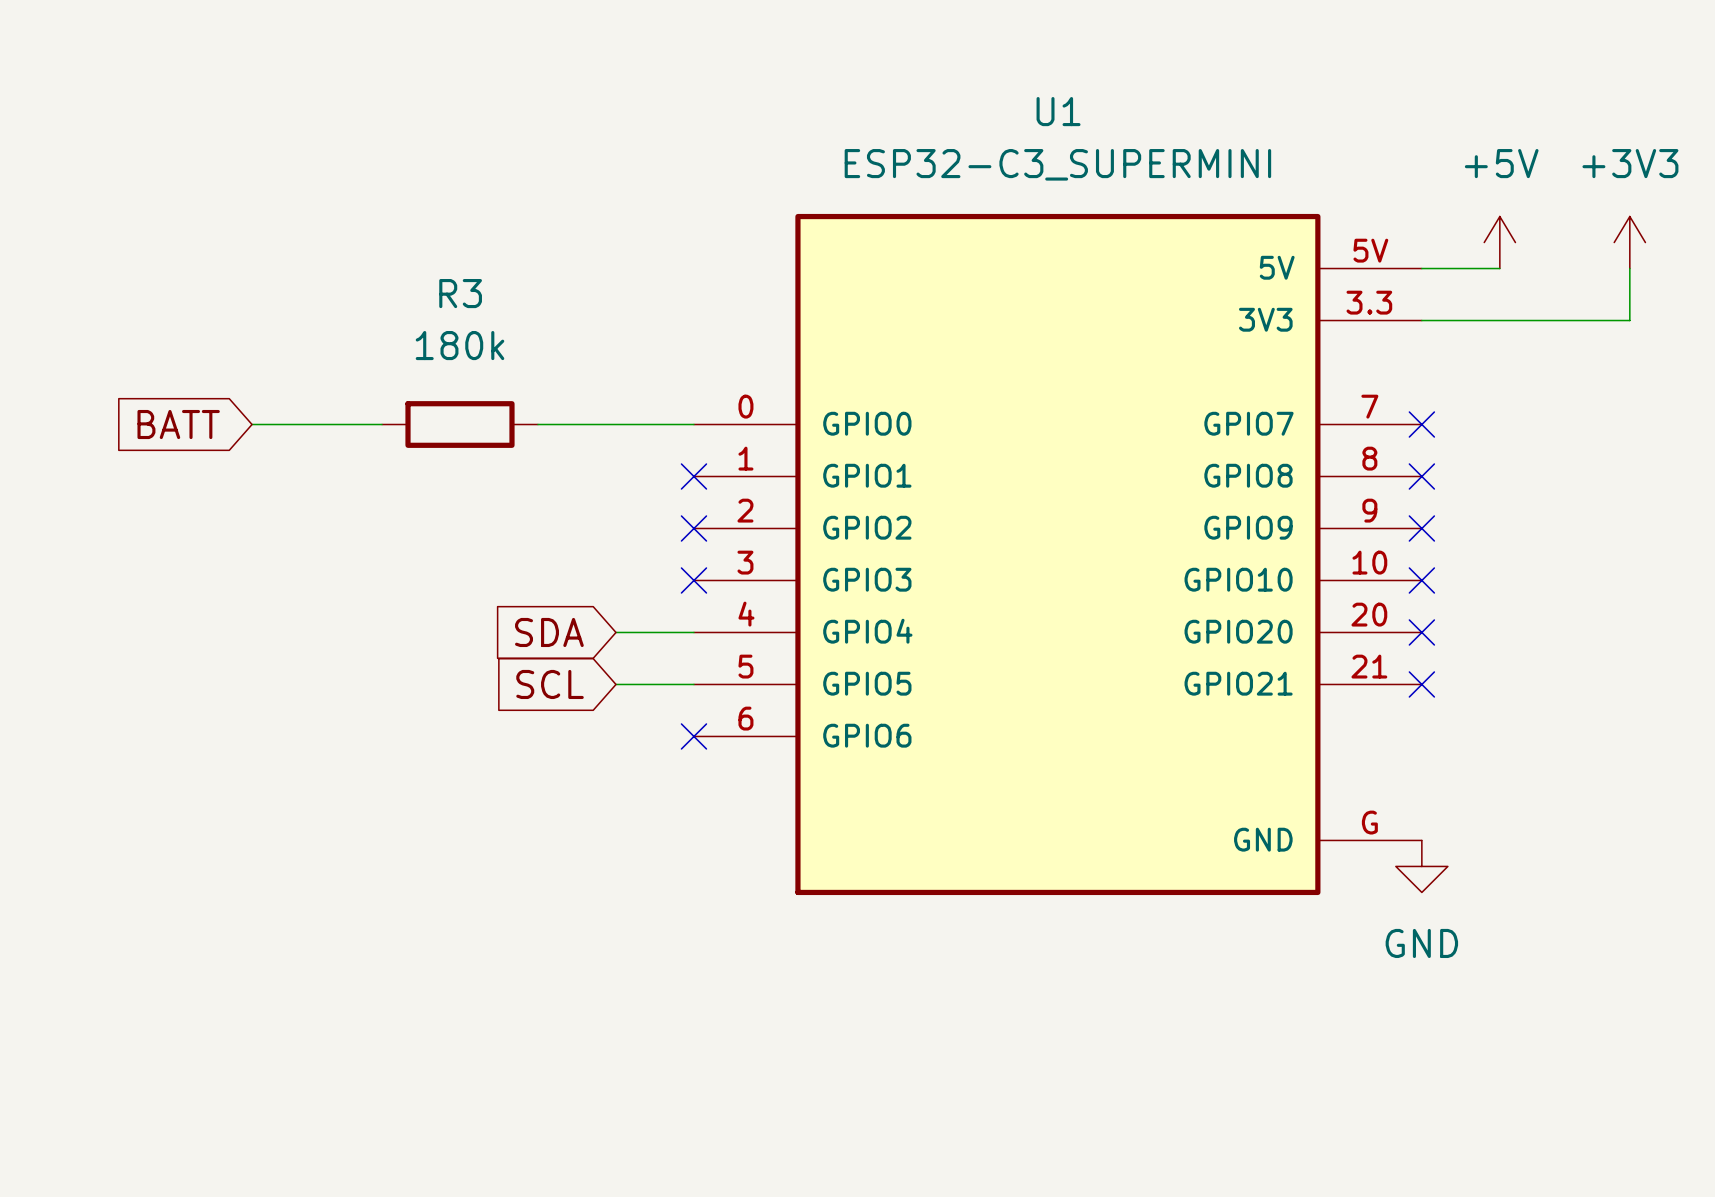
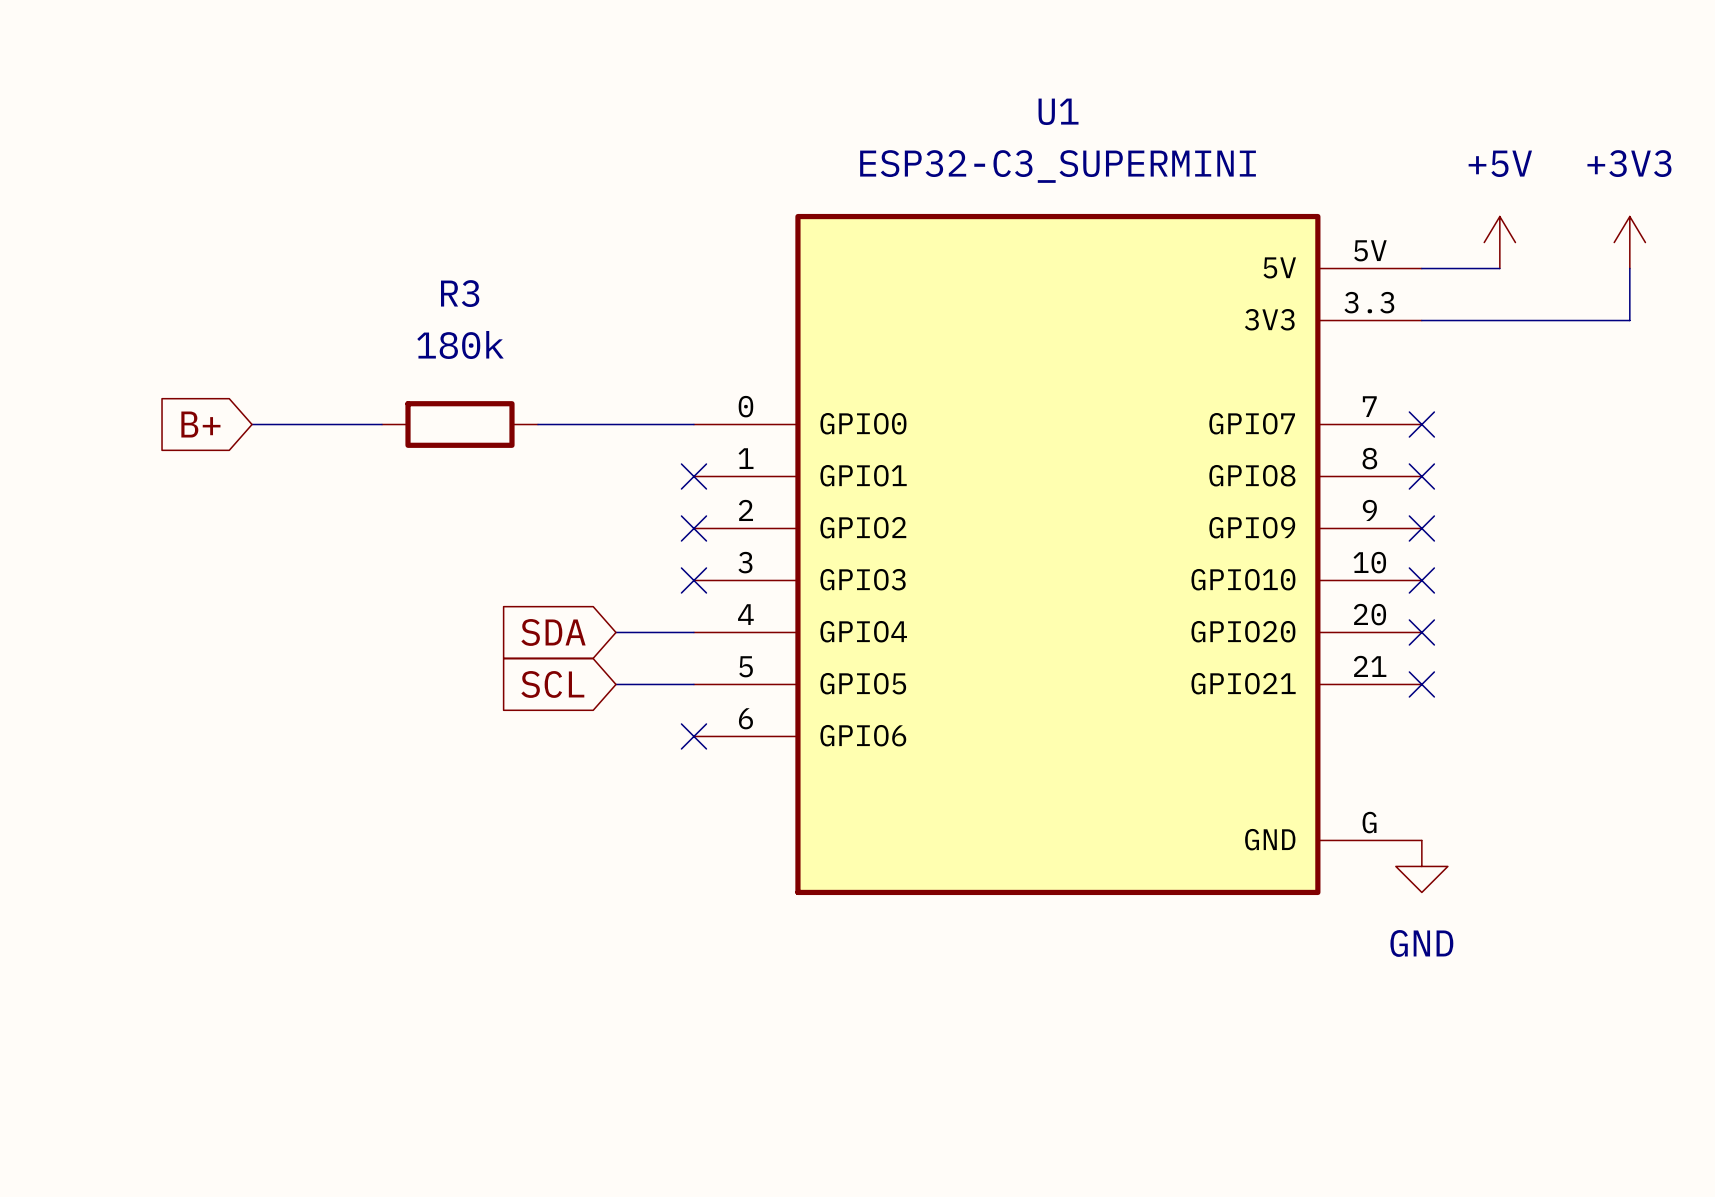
global label: BATT (178, 424) -> B+ (200, 424)

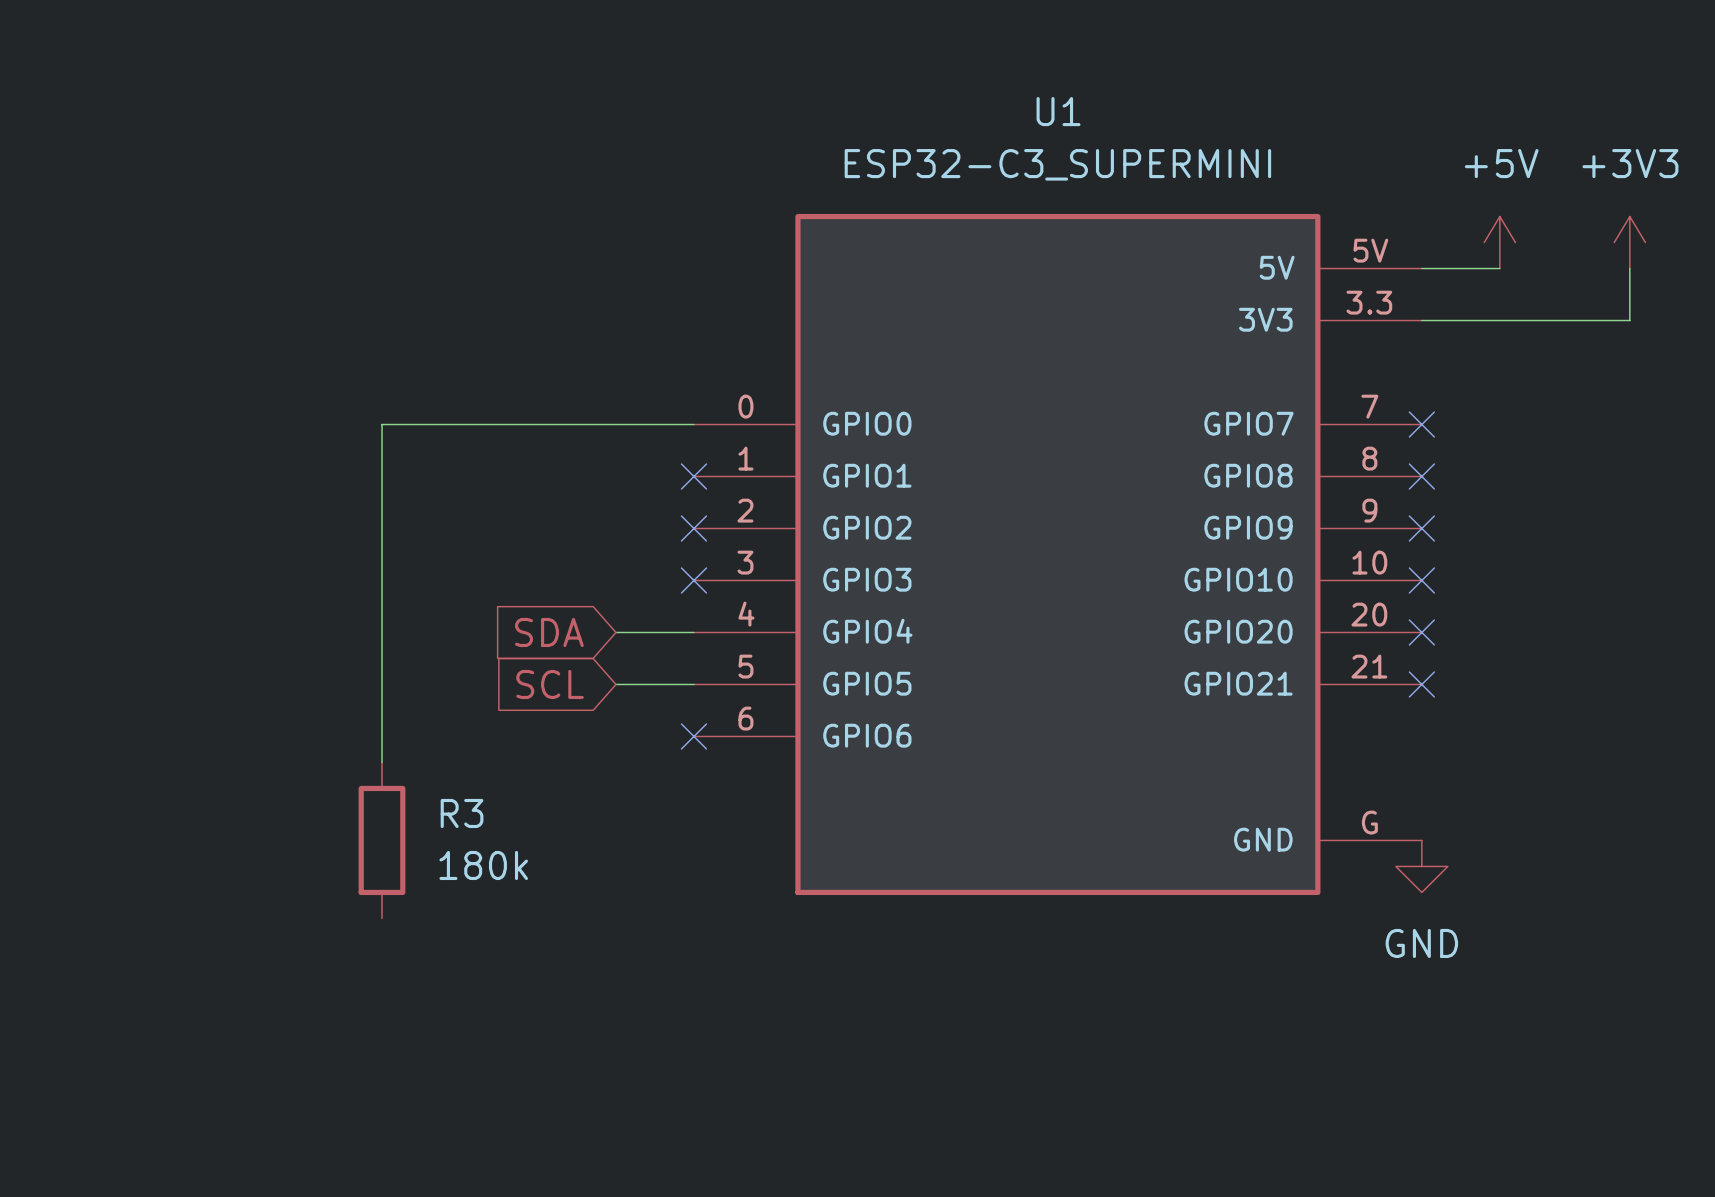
R3 name position: R3 (460, 293) -> R3 (462, 813)
global label: B+ (200, 424) -> none
wire: (252, 424) (382, 424) -> none
R3 rotation: 0° (459, 424) -> 90° clockwise (382, 840)
R3 position: (459, 424) -> (382, 840)
wire: none -> (537, 424) (382, 424) (382, 762)

